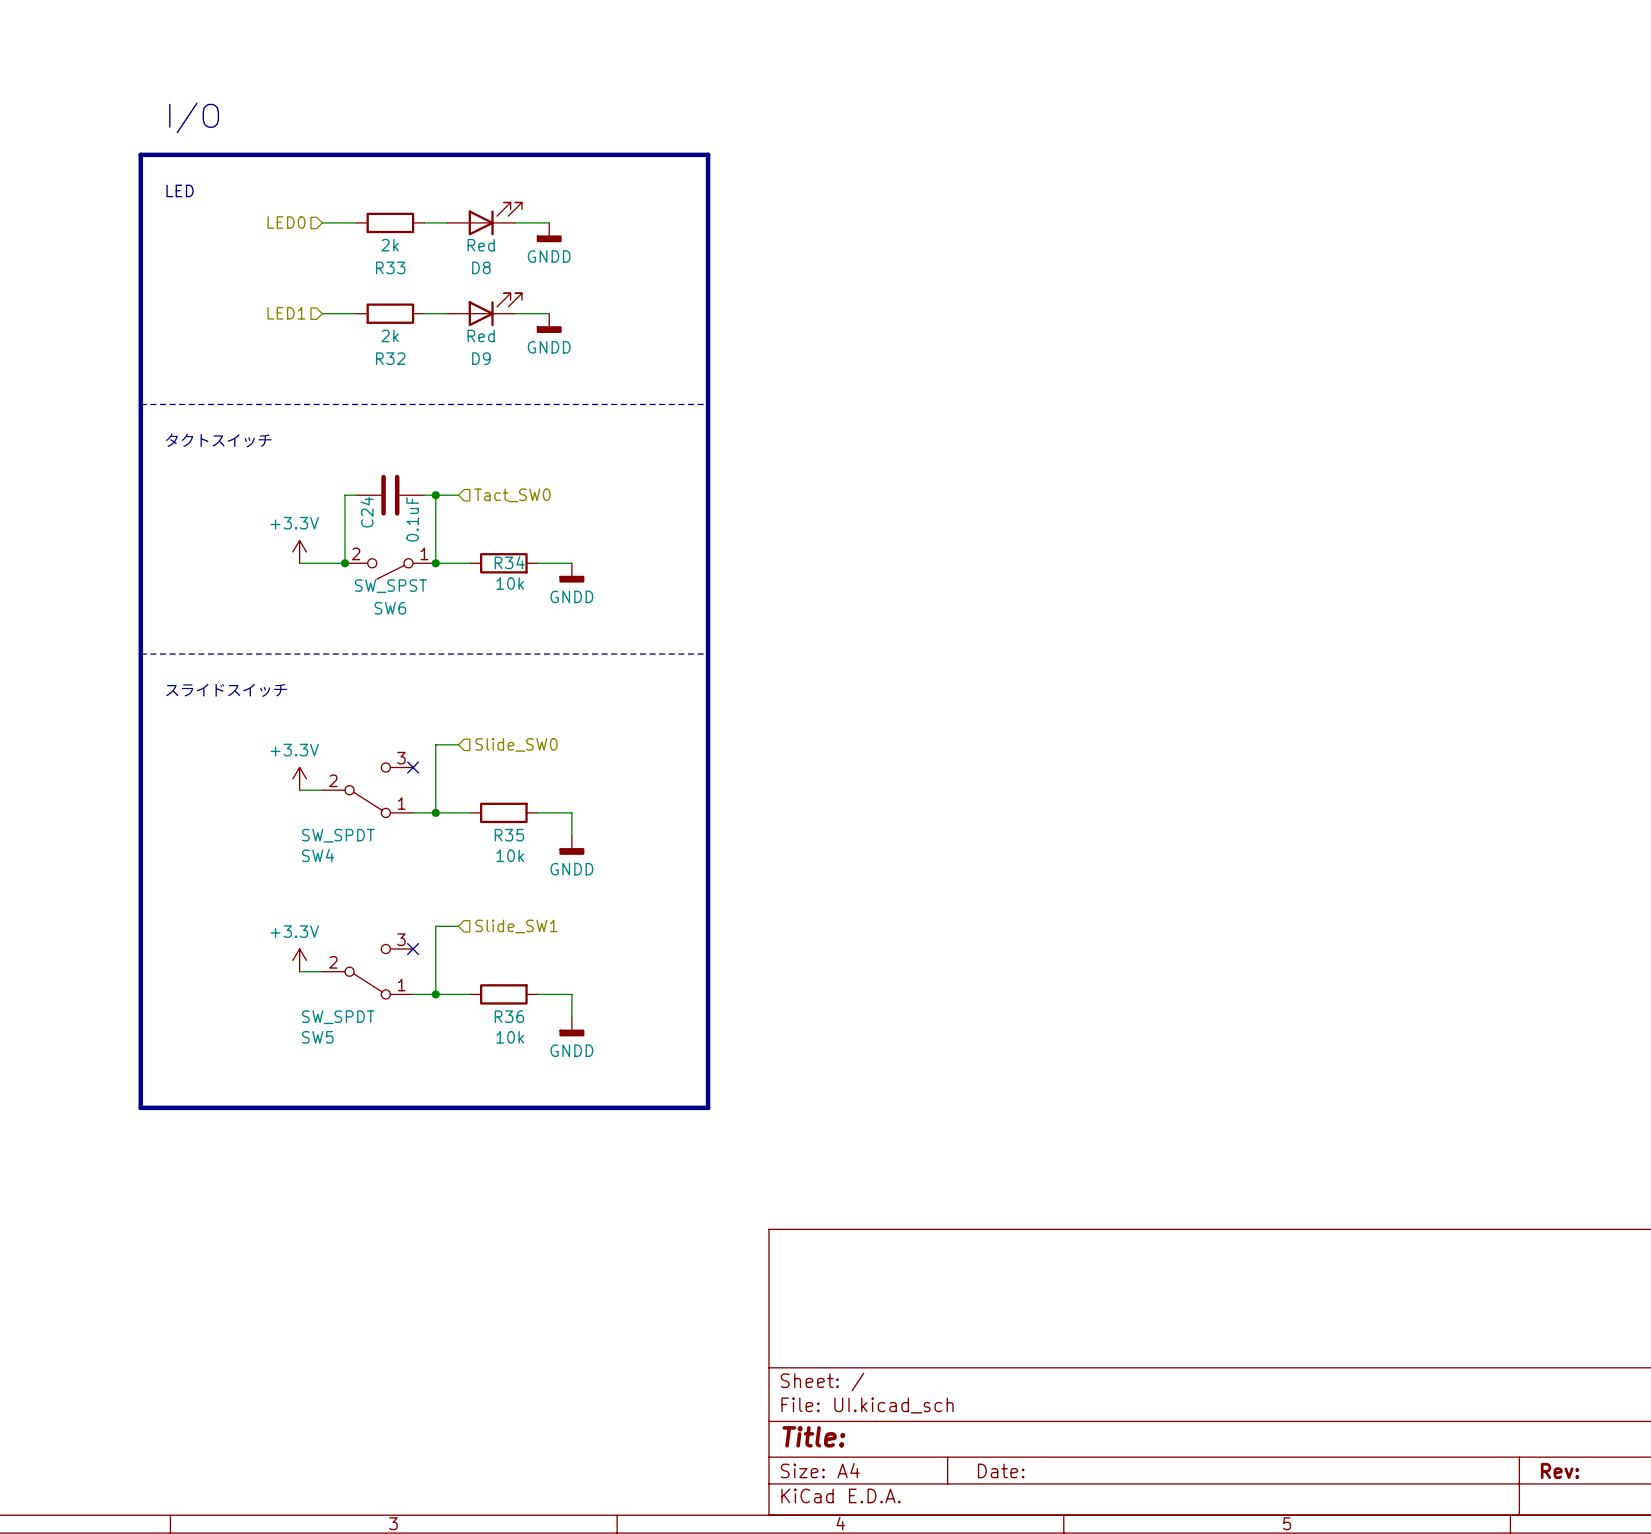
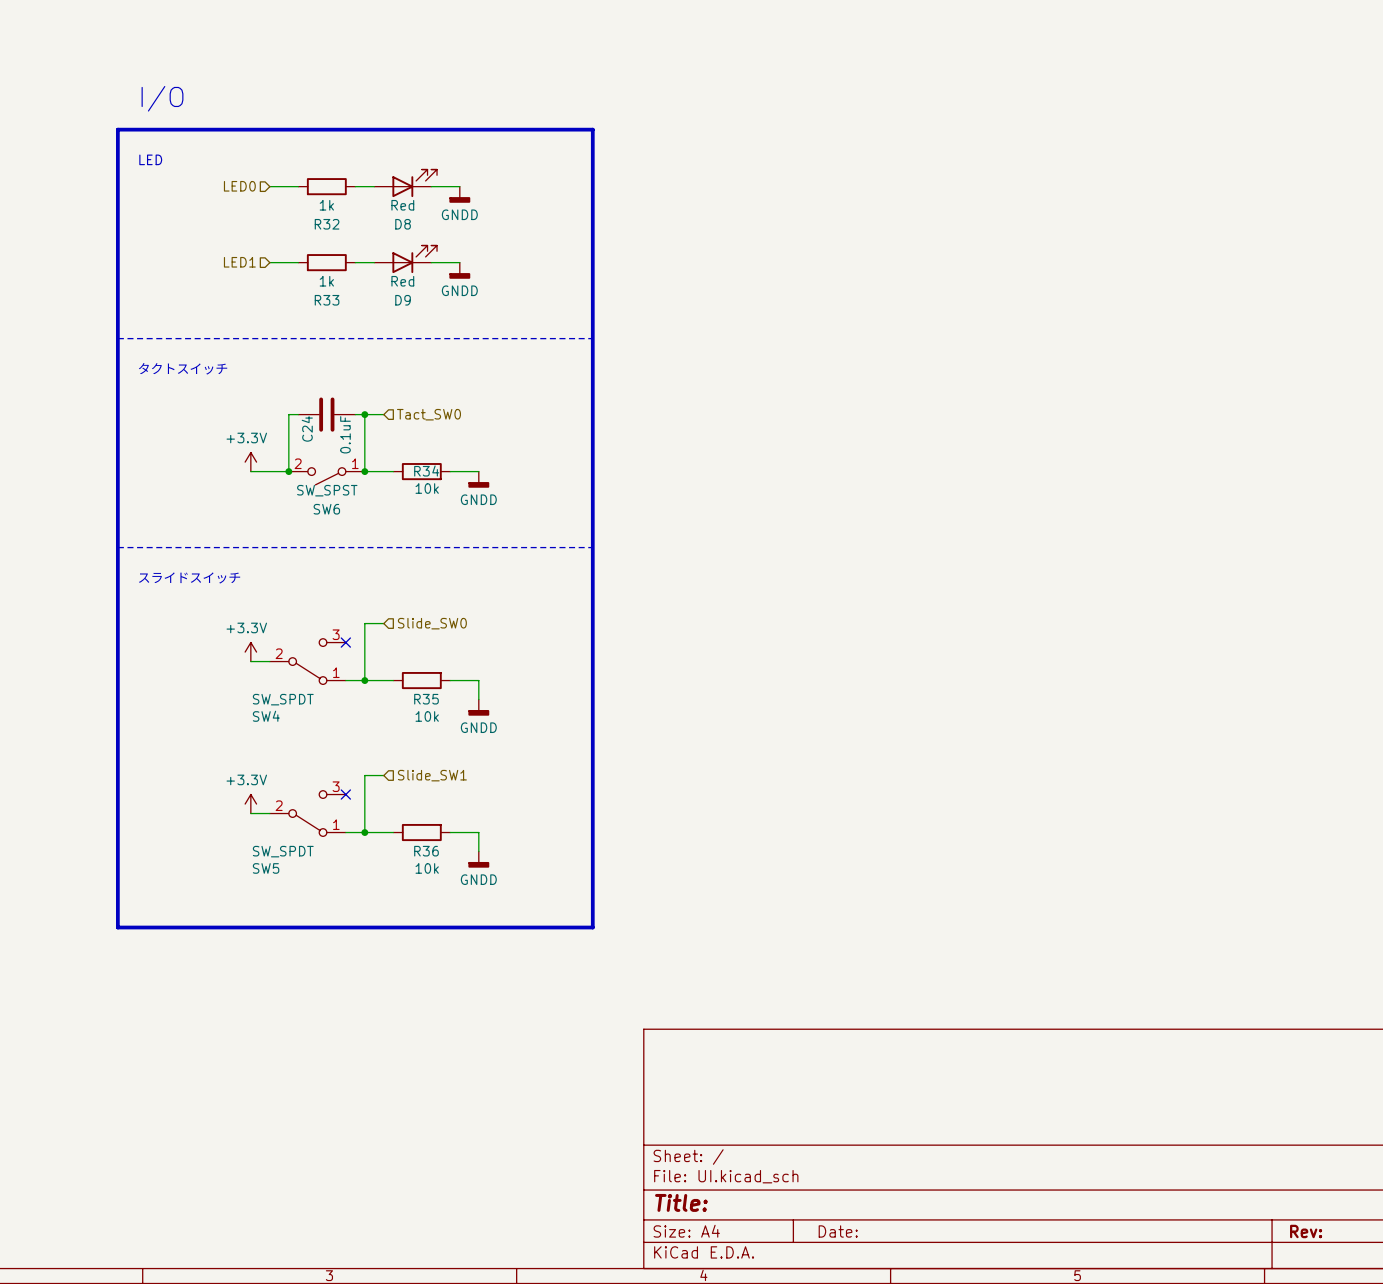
R33 value: 2k (390, 245) -> 1k (326, 205)
R33 name: R33 (390, 267) -> R32 (327, 224)
R32 value: 2k (390, 335) -> 1k (326, 281)
R32 name: R32 (390, 358) -> R33 (327, 300)

